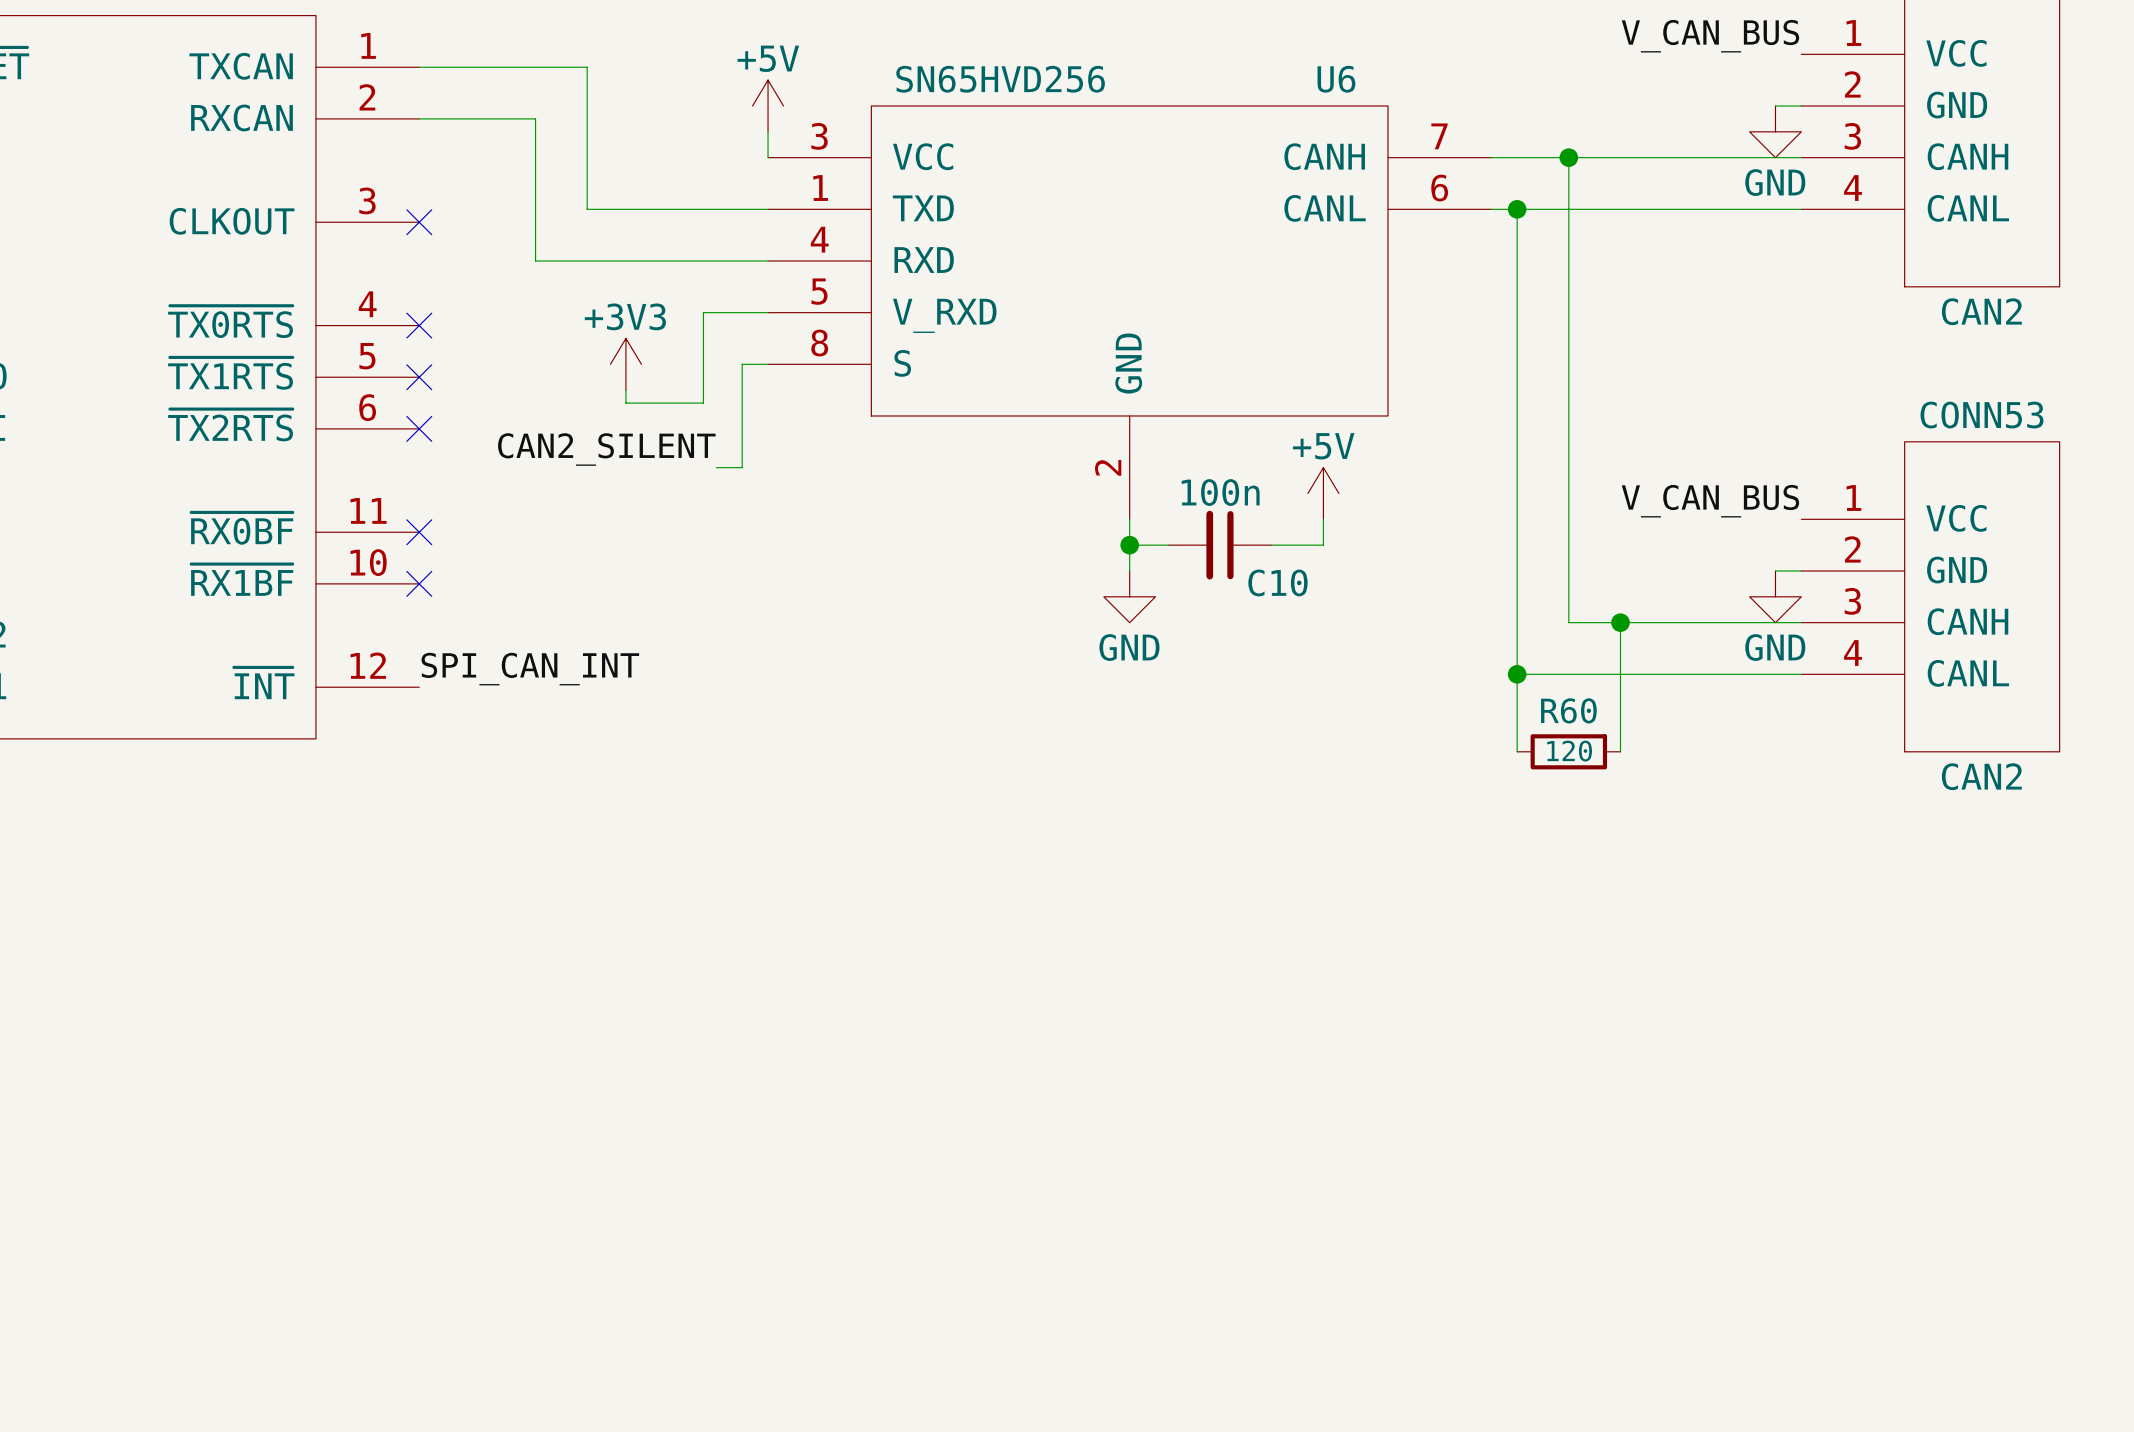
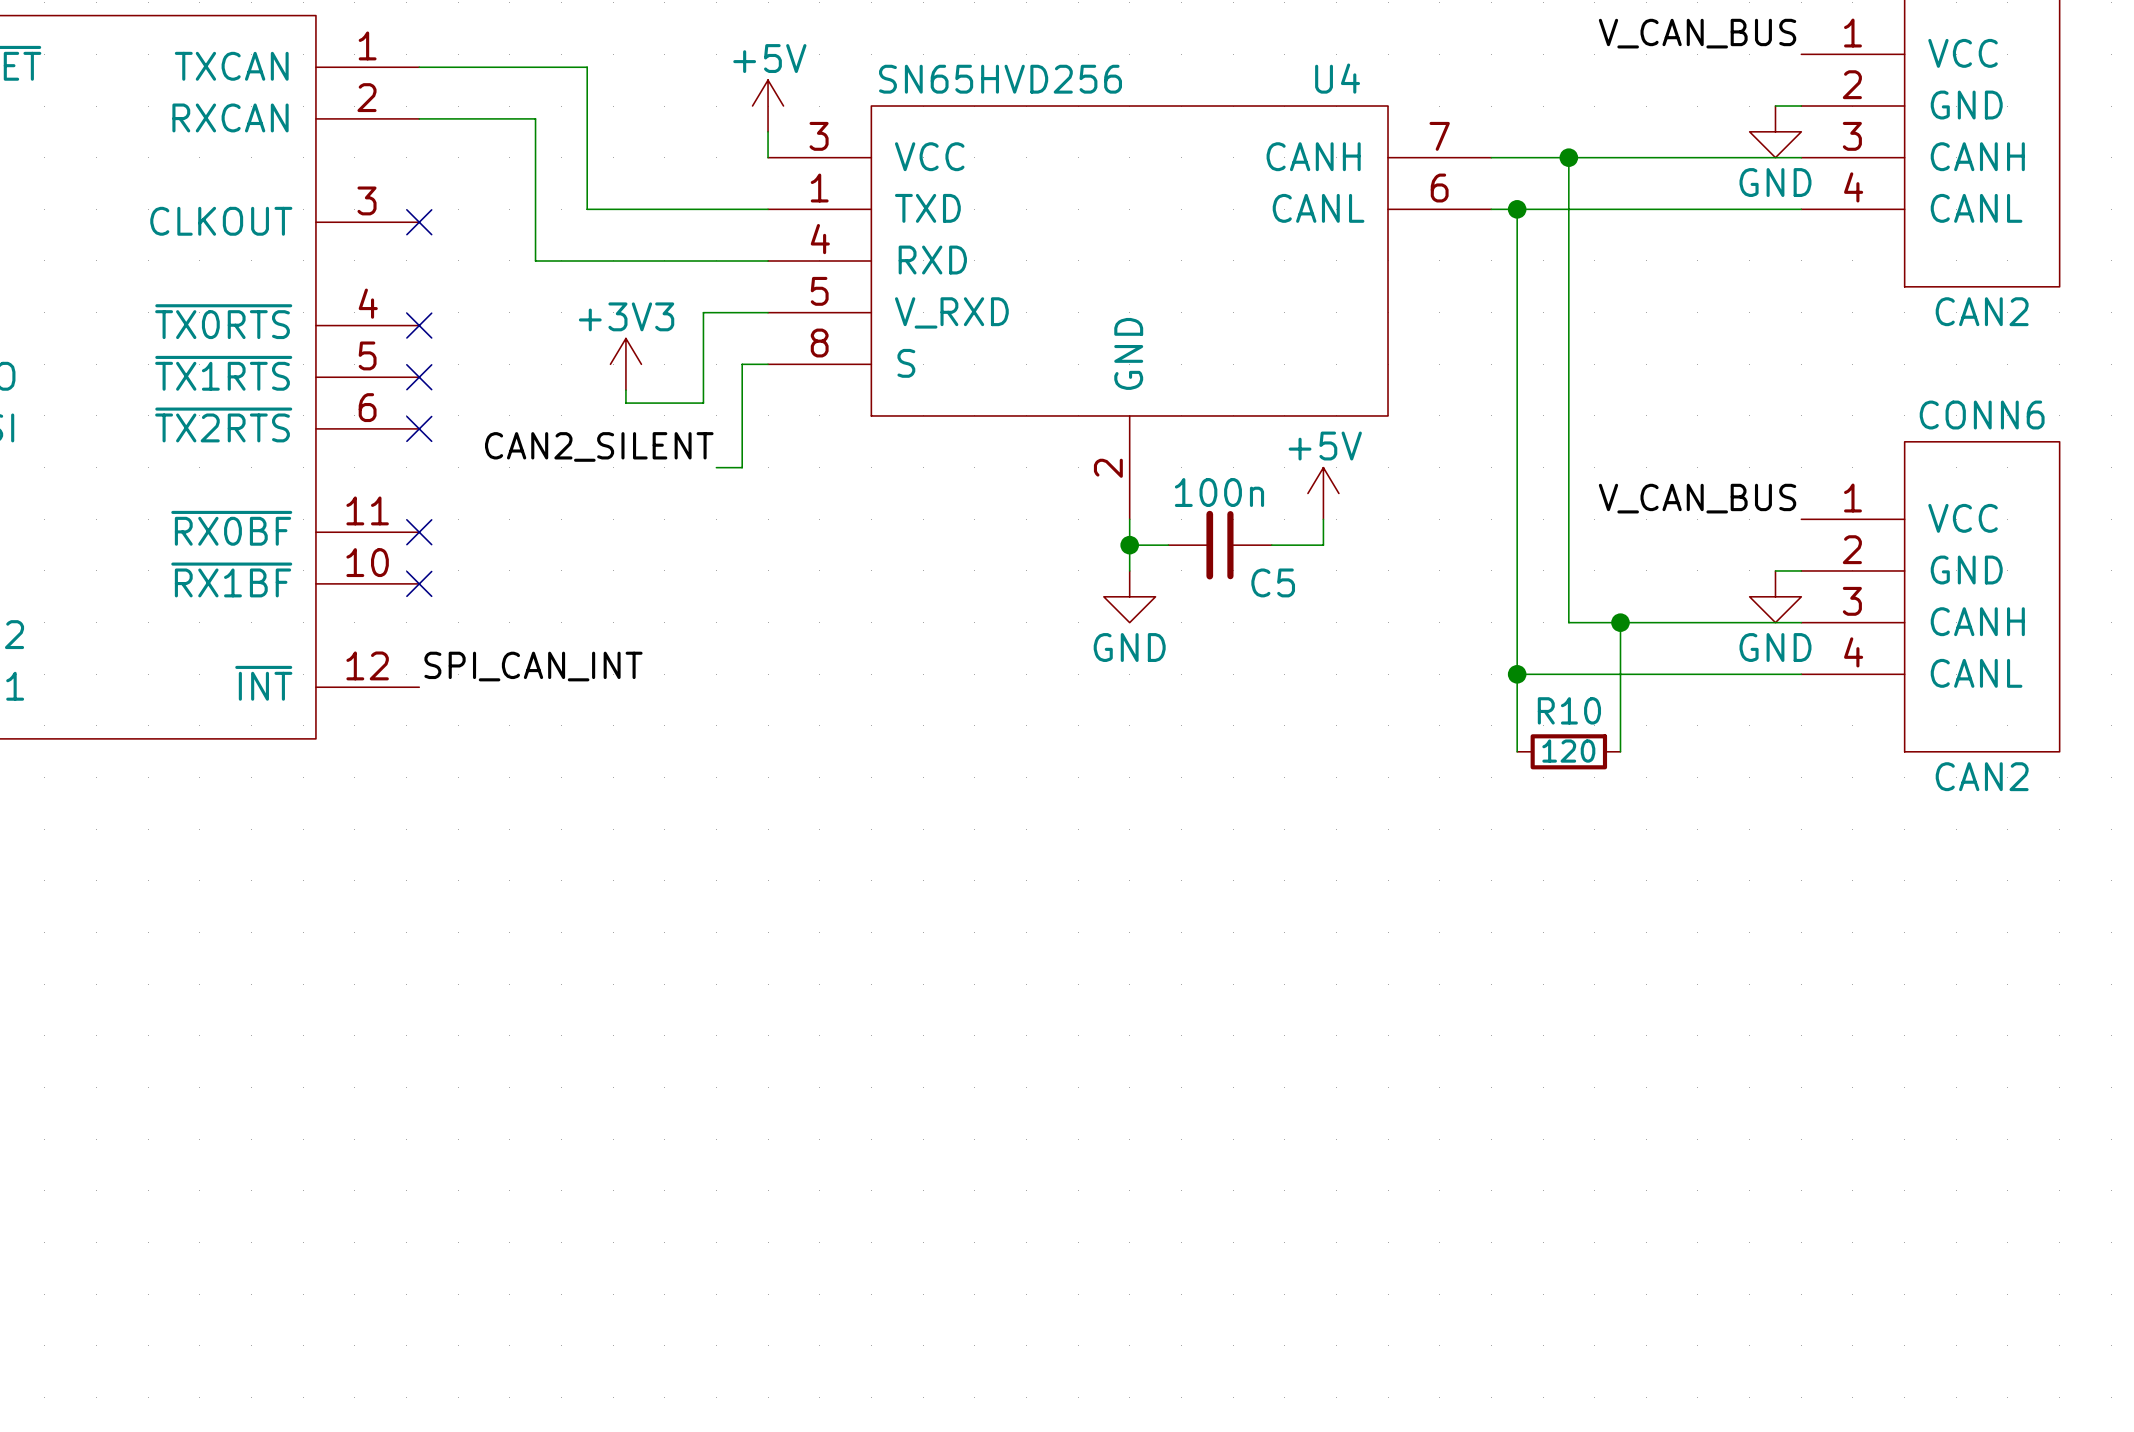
U6 name: U6 (1336, 79) -> U4 (1337, 78)
CONN53 name: CONN53 (1982, 415) -> CONN6 (1982, 415)
C10 name: C10 (1277, 582) -> C5 (1273, 582)
R60 name: R60 (1568, 710) -> R10 (1569, 710)

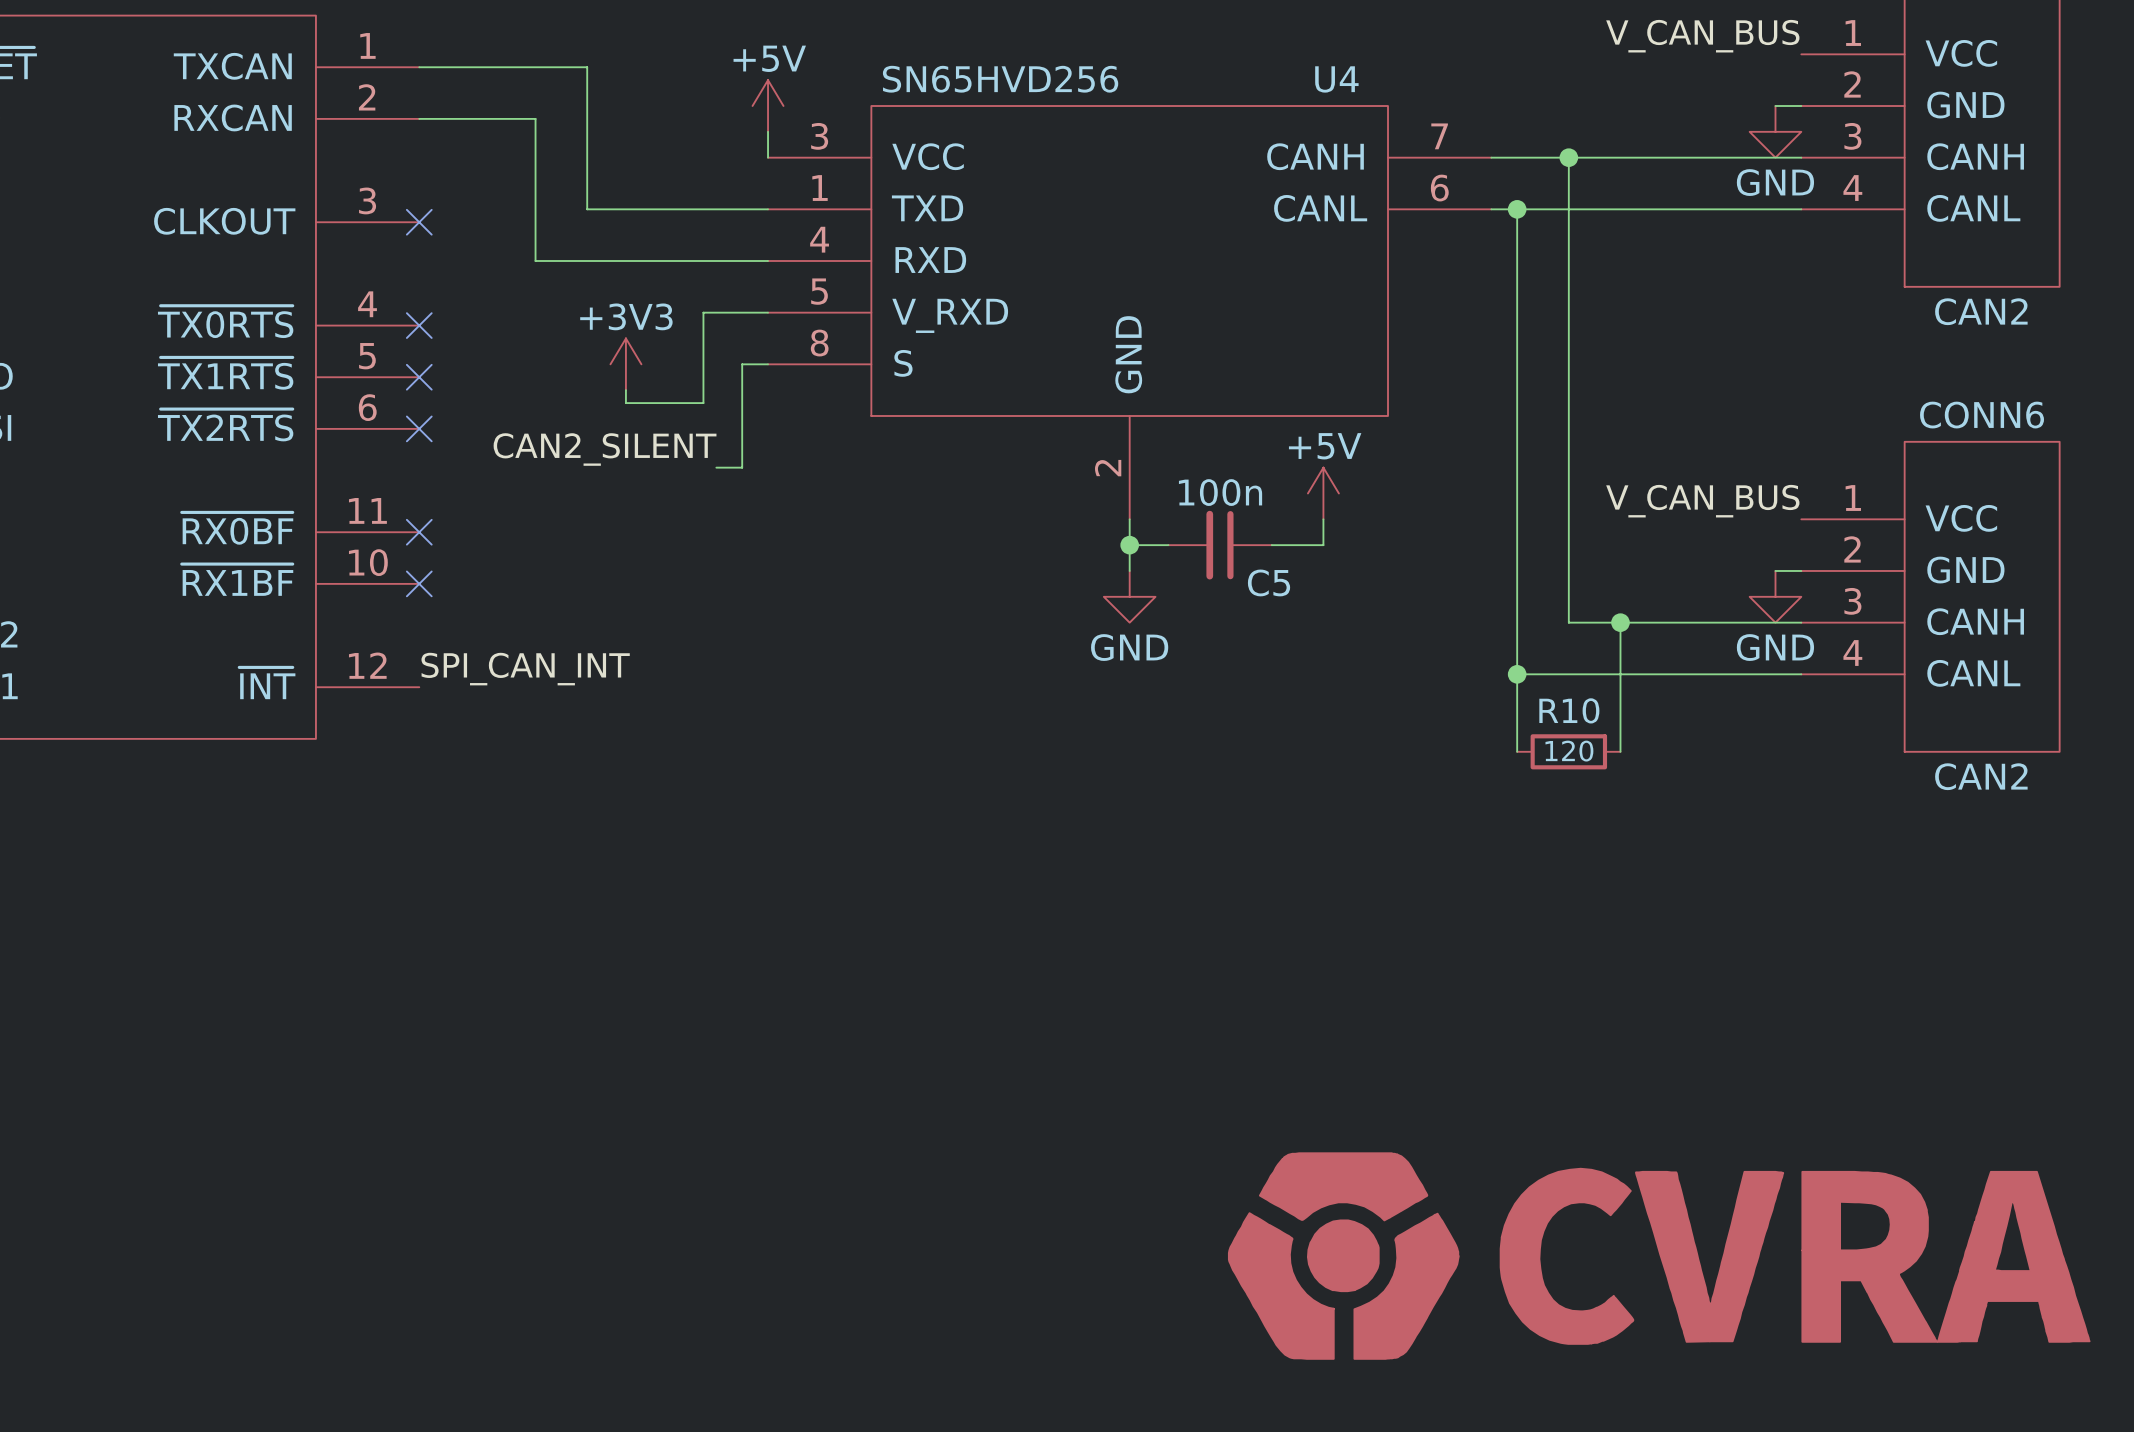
power symbol: none -> (1659, 1256)

